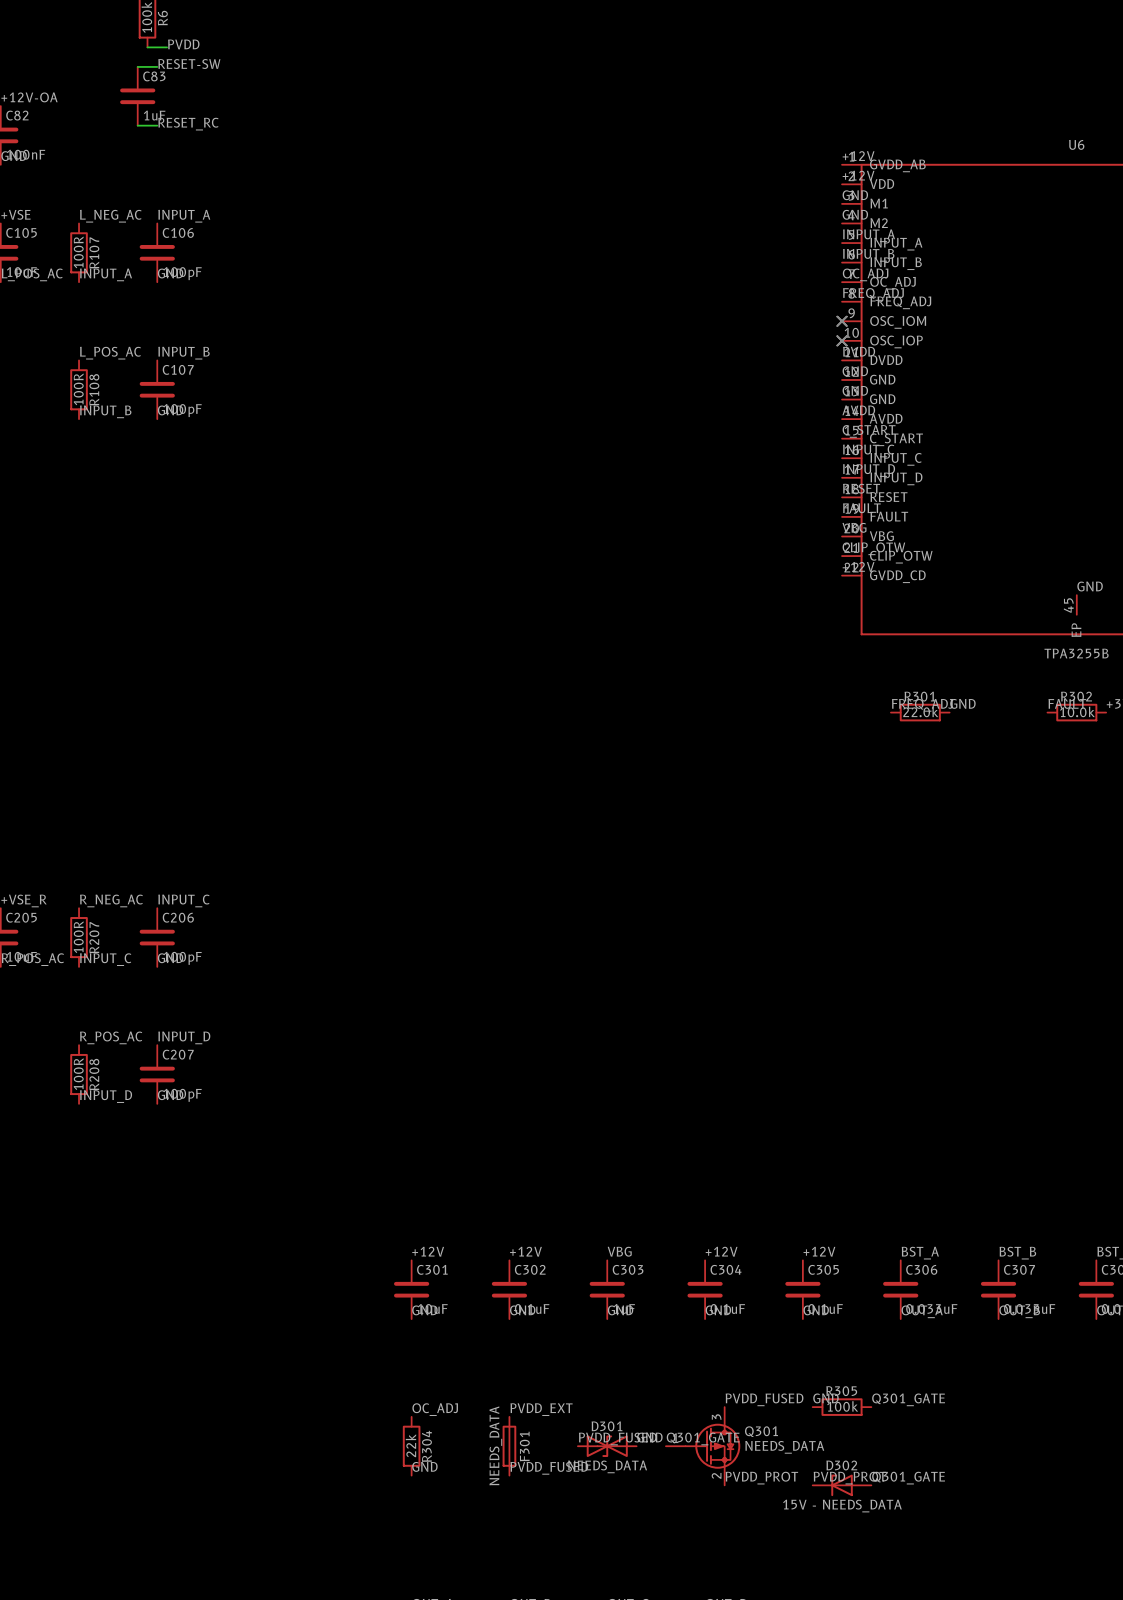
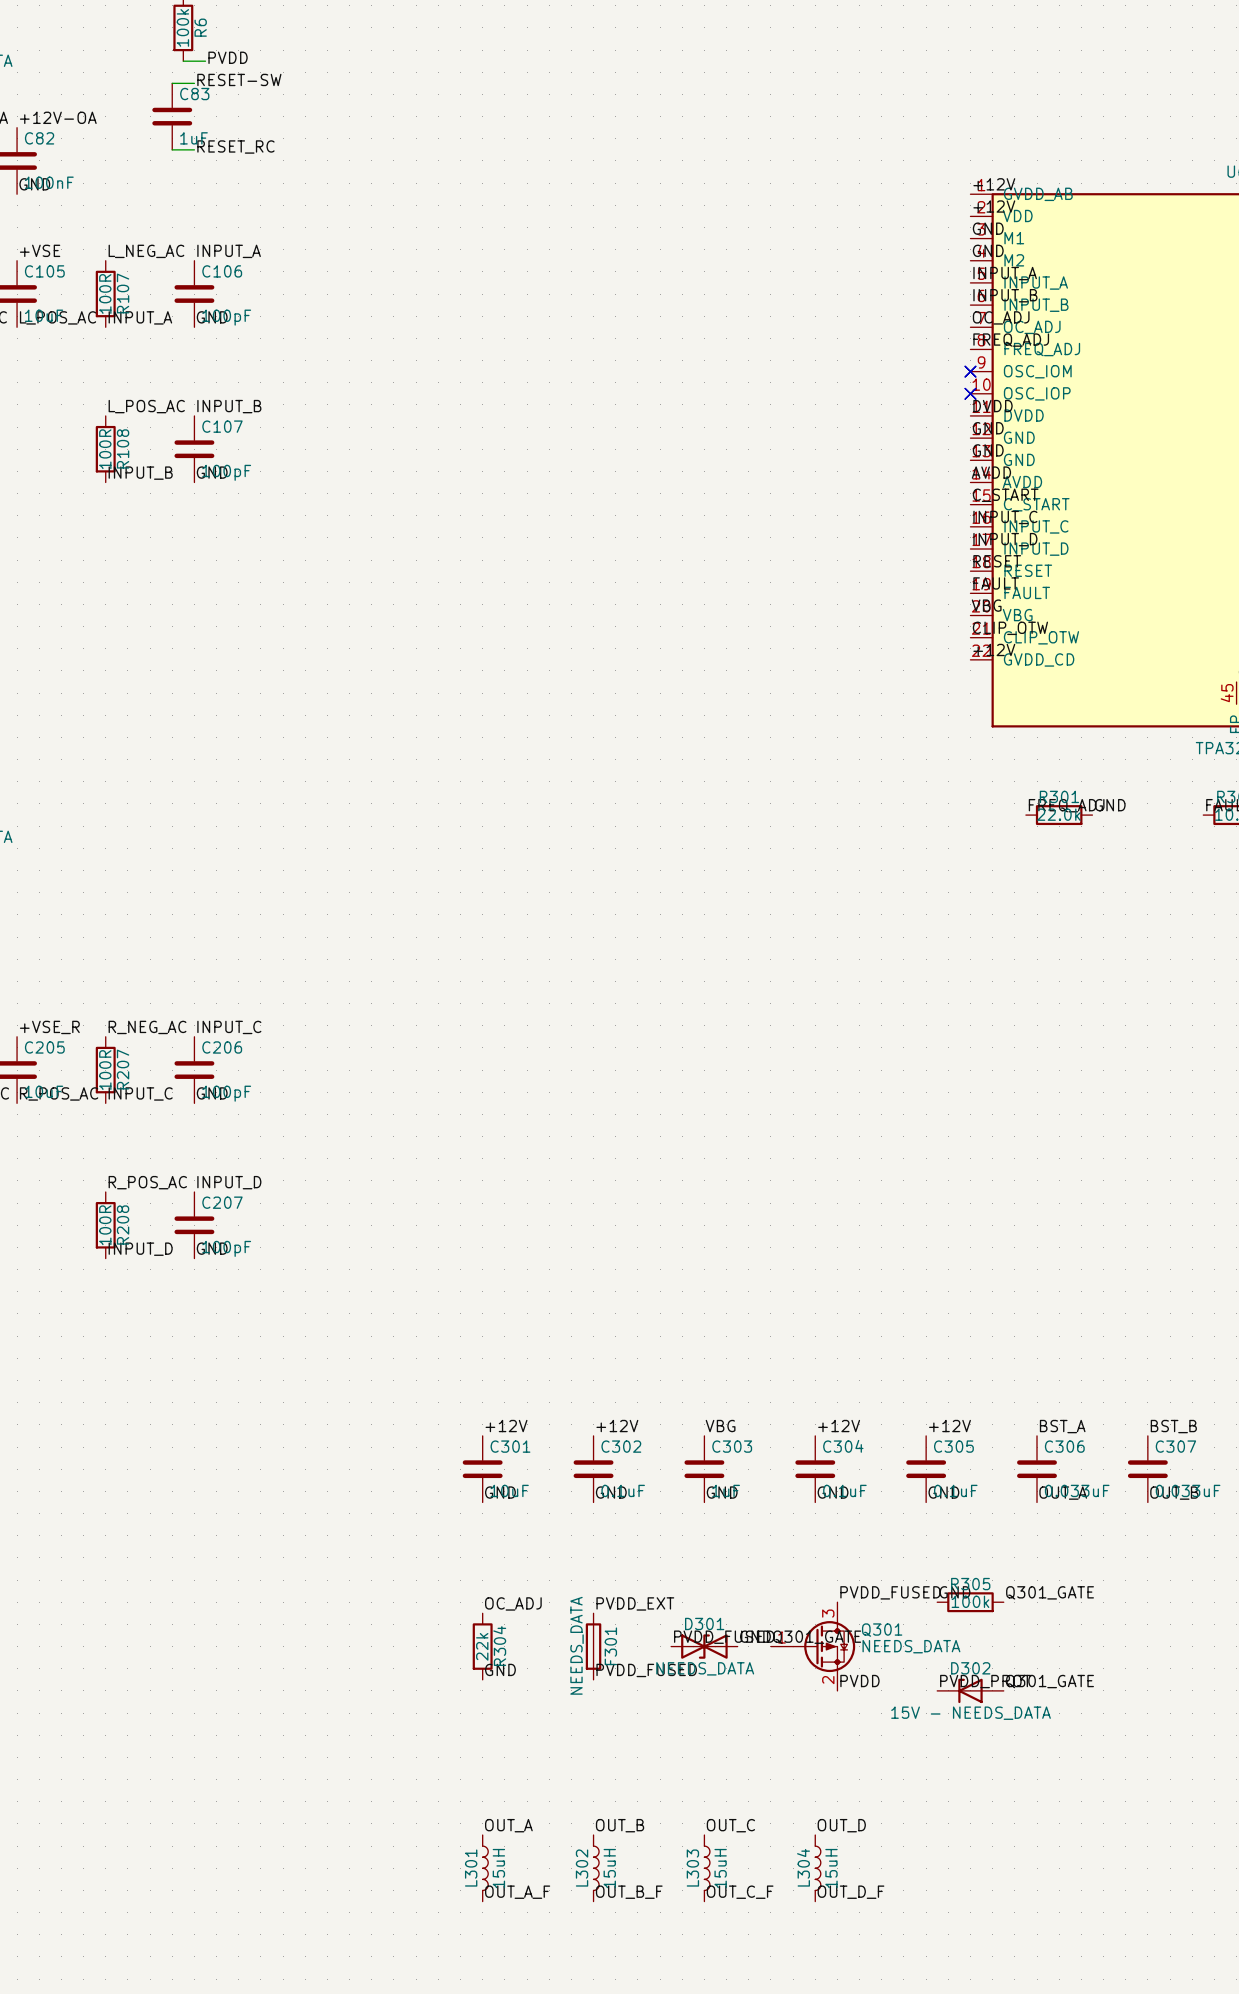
label: PVDD_PROT (761, 1478) -> PVDD (859, 1681)

